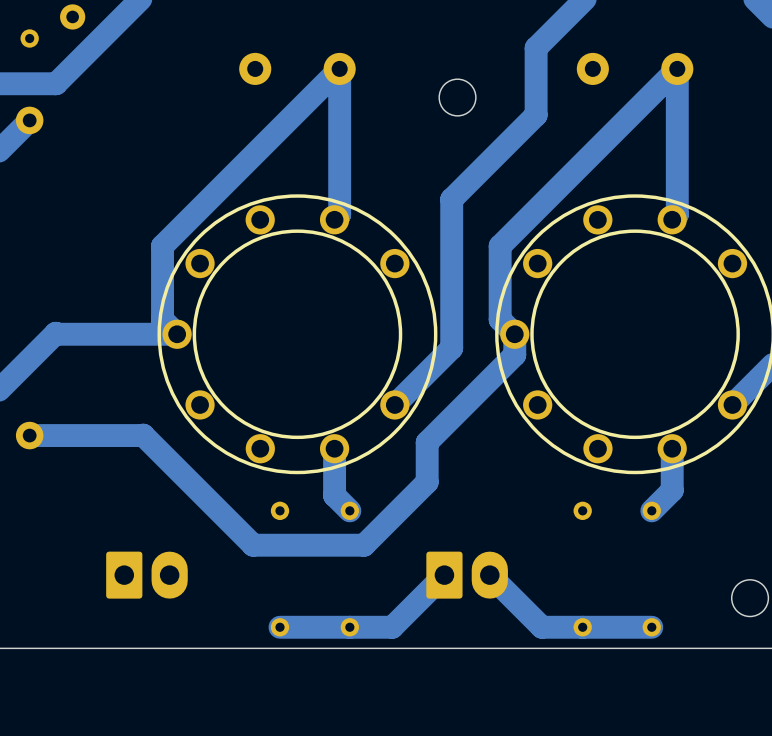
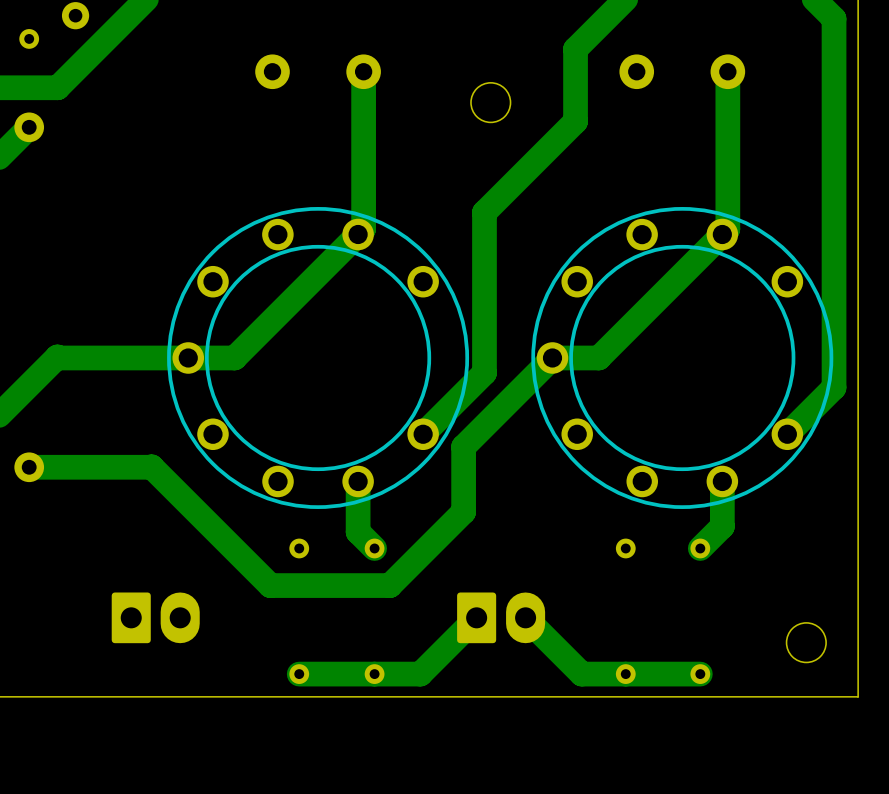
track: (339, 68) (162, 246) (162, 319) (177, 334) -> (358, 234) (234, 357) (188, 357)
track: (677, 68) (500, 246) (500, 319) (514, 334) (514, 354) (427, 442) (427, 482) -> (722, 234) (598, 357) (552, 357) (463, 446) (463, 511) (458, 517)

